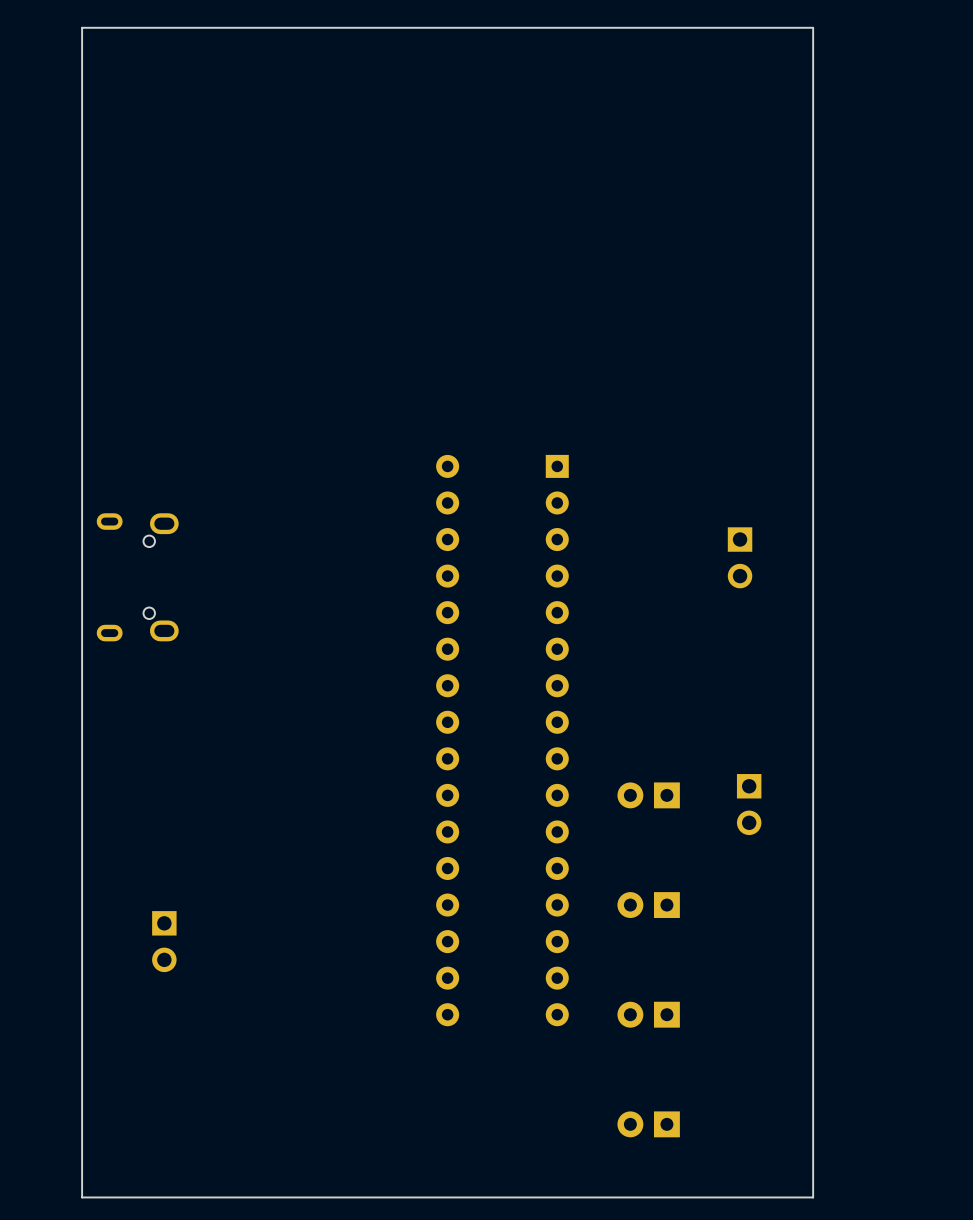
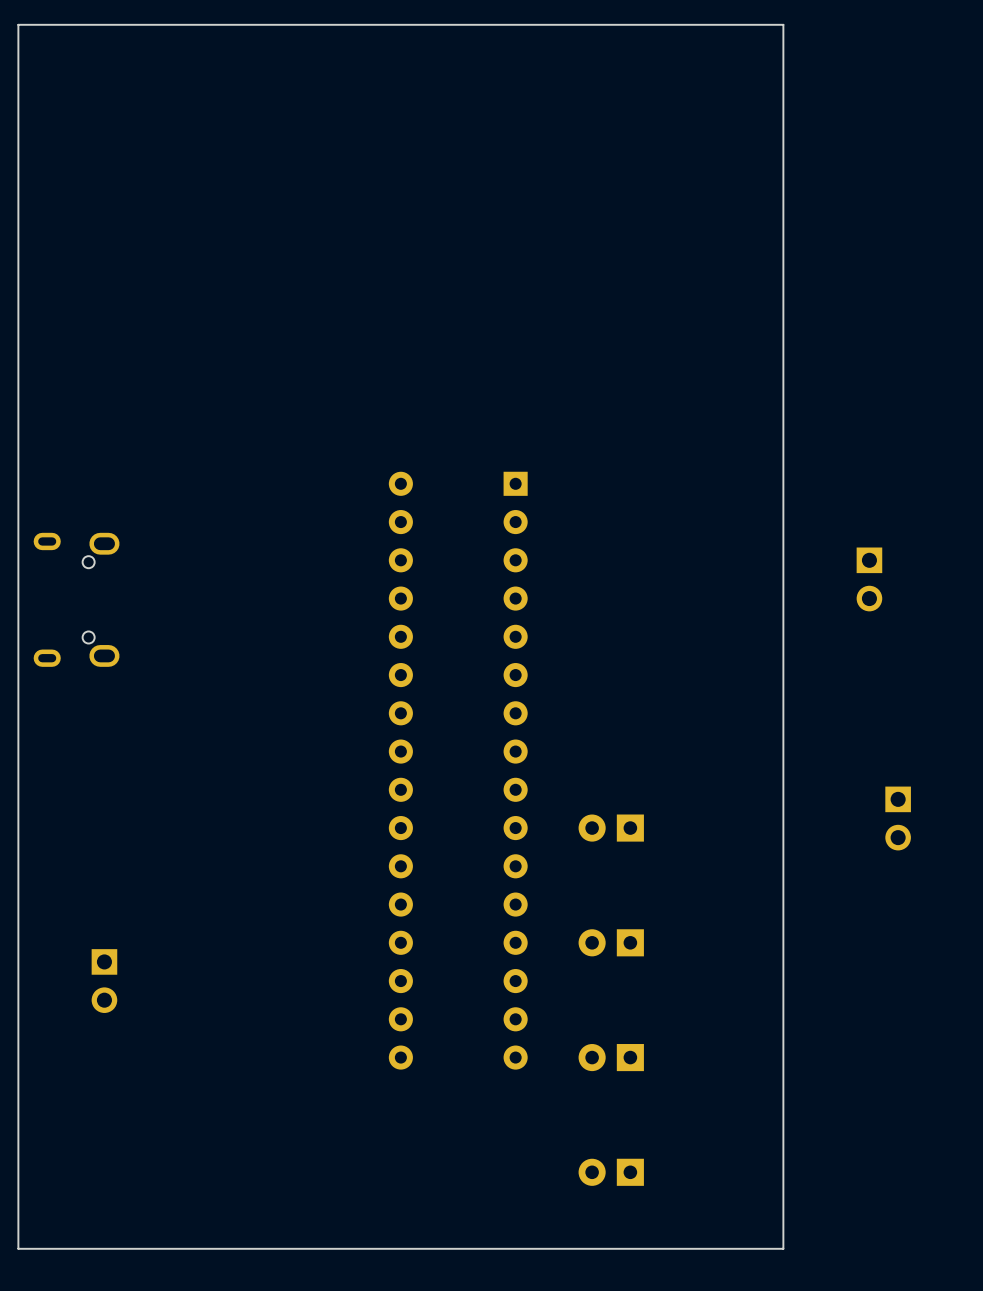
part: (740, 557) -> none
part: none -> (869, 579)
part: none -> (898, 818)
part: (749, 804) -> none

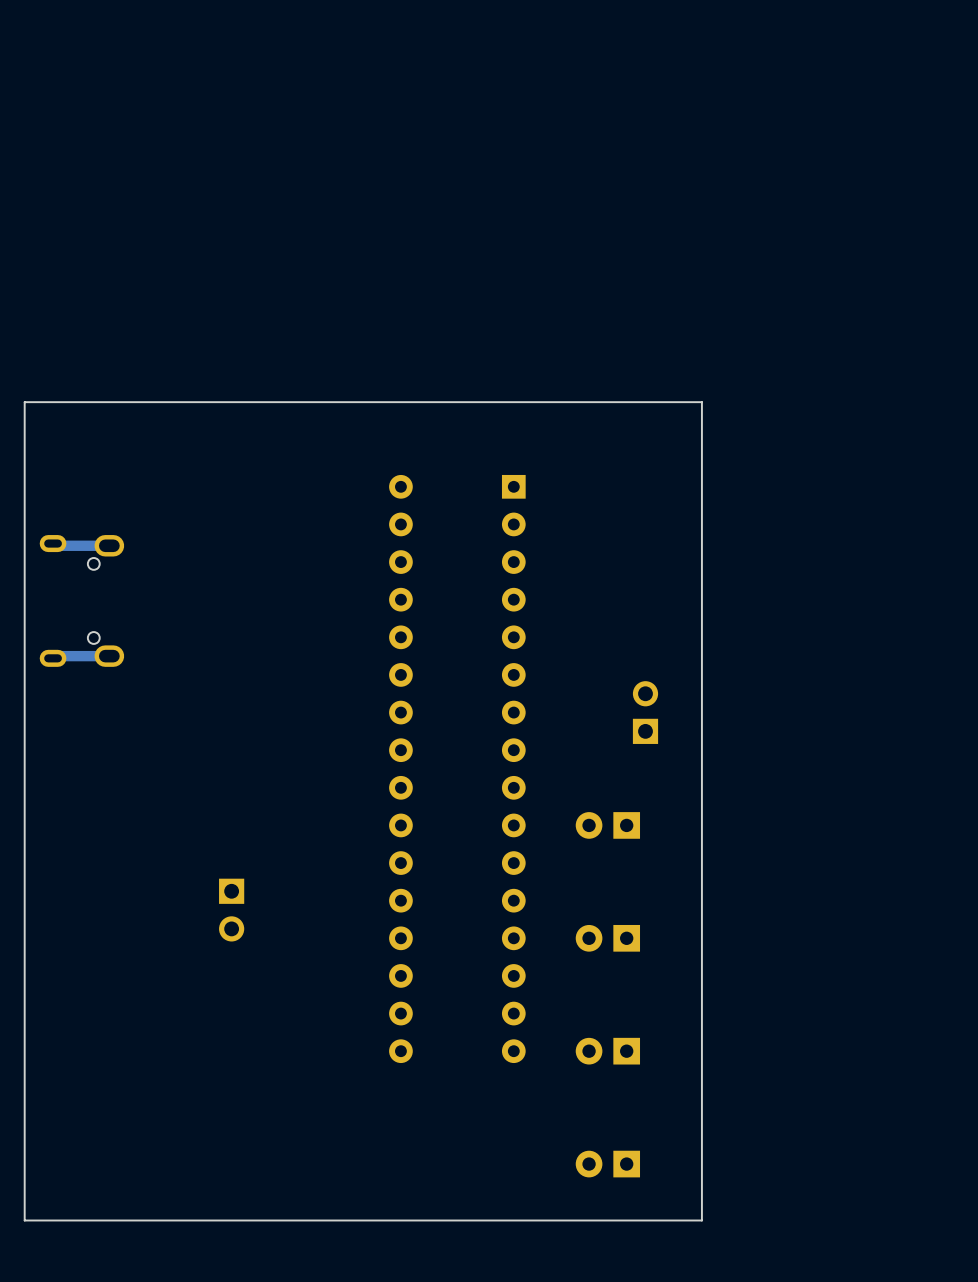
board edge: (18, 397) (18, 24) (783, 24) (783, 1248) (18, 1248) (18, 1229) -> (24, 402) (701, 402) (701, 1220) (24, 1220)
track: none -> (53, 543) (55, 545) (109, 545)
part: (869, 579) -> none
track: none -> (109, 656) (55, 656) (53, 658)
part: none -> (645, 712)
part: (898, 818) -> none
part position: (104, 981) -> (231, 910)

